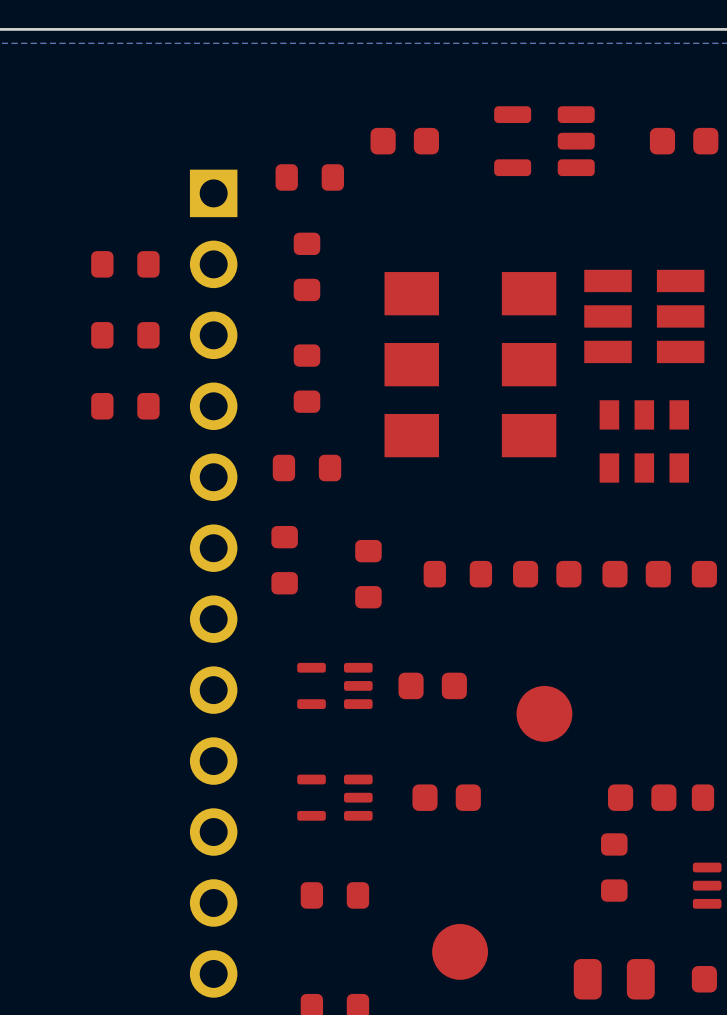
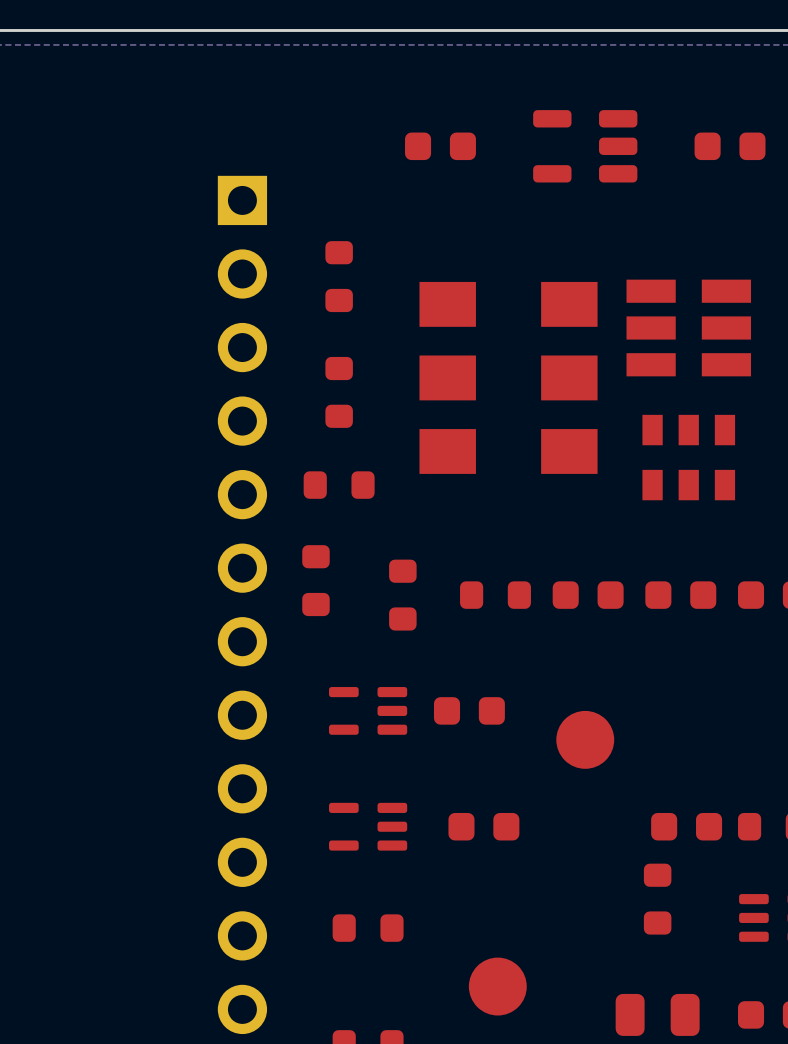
part: (309, 177) -> none
part: (125, 264) -> none
part: (125, 335) -> none
part: (125, 406) -> none

